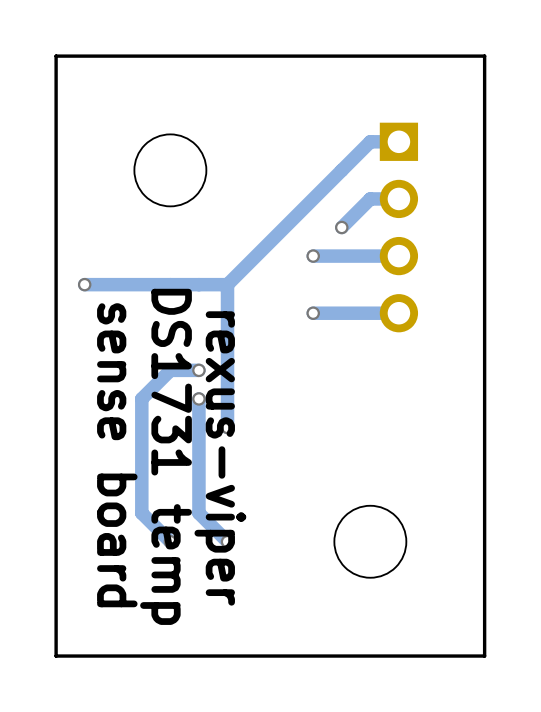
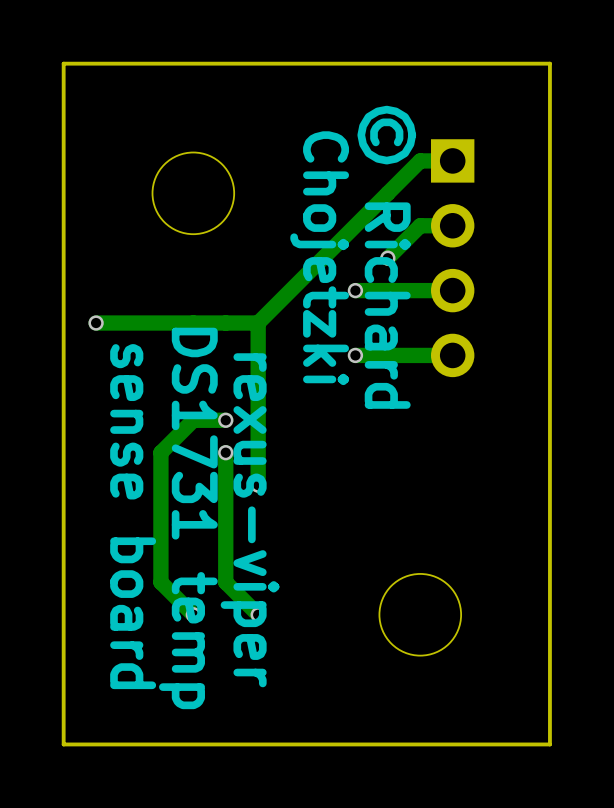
text: none -> © Richard (386, 257)
text: none -> Chojetzki (319, 258)

